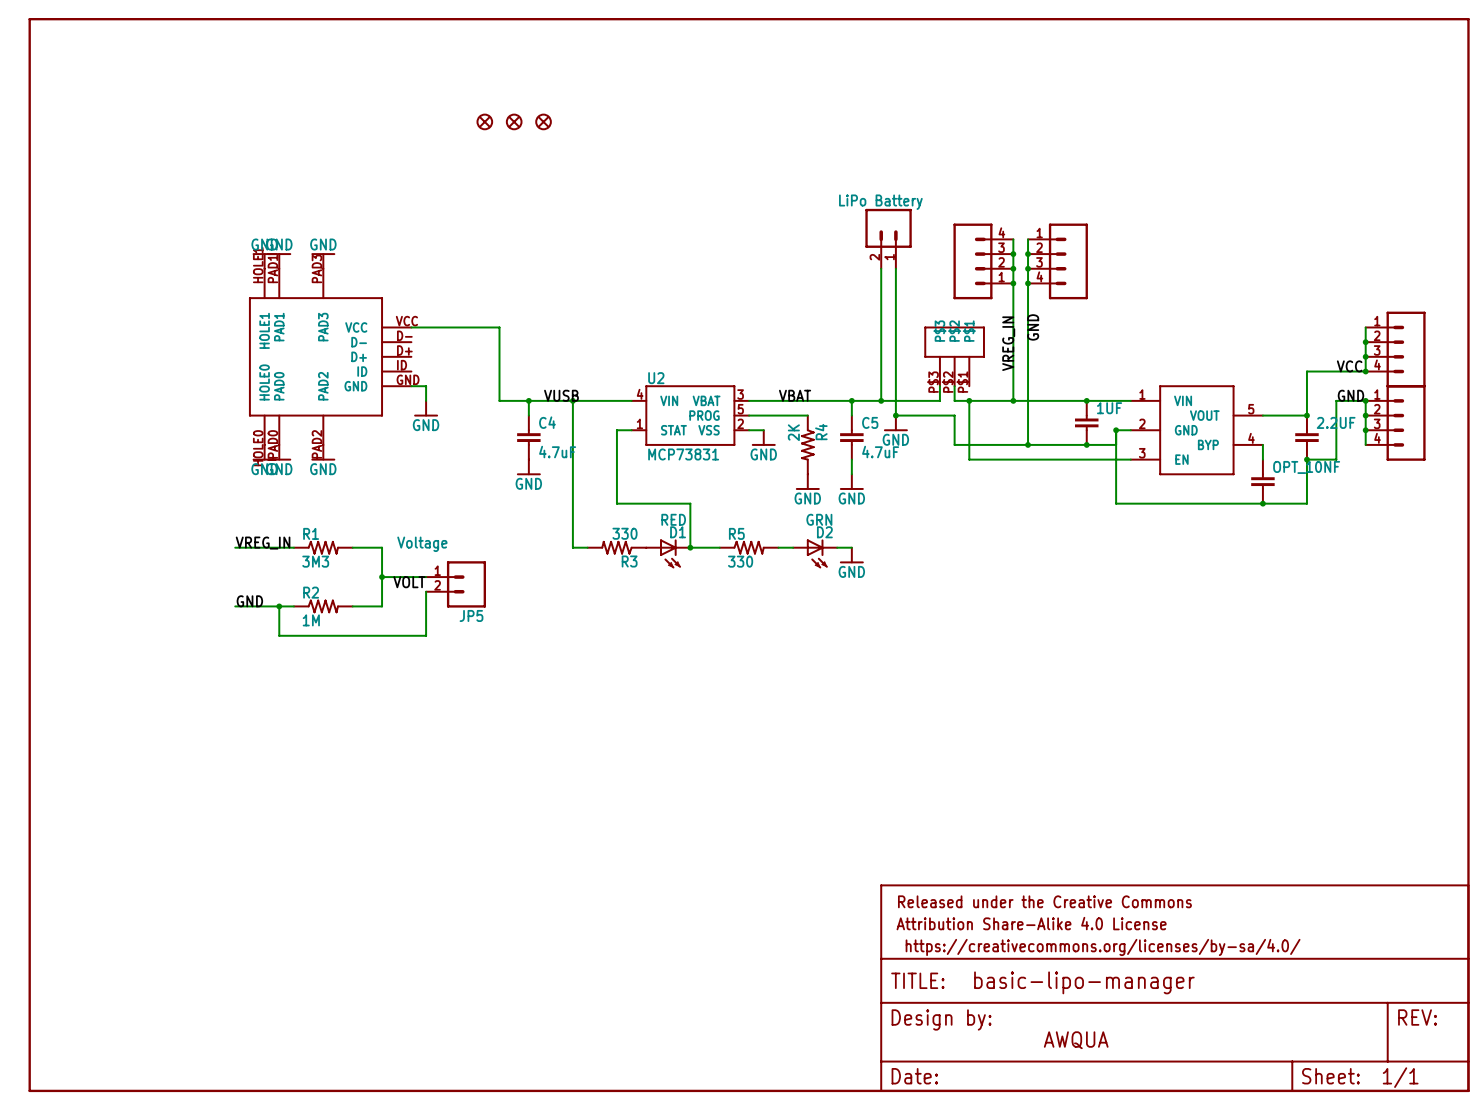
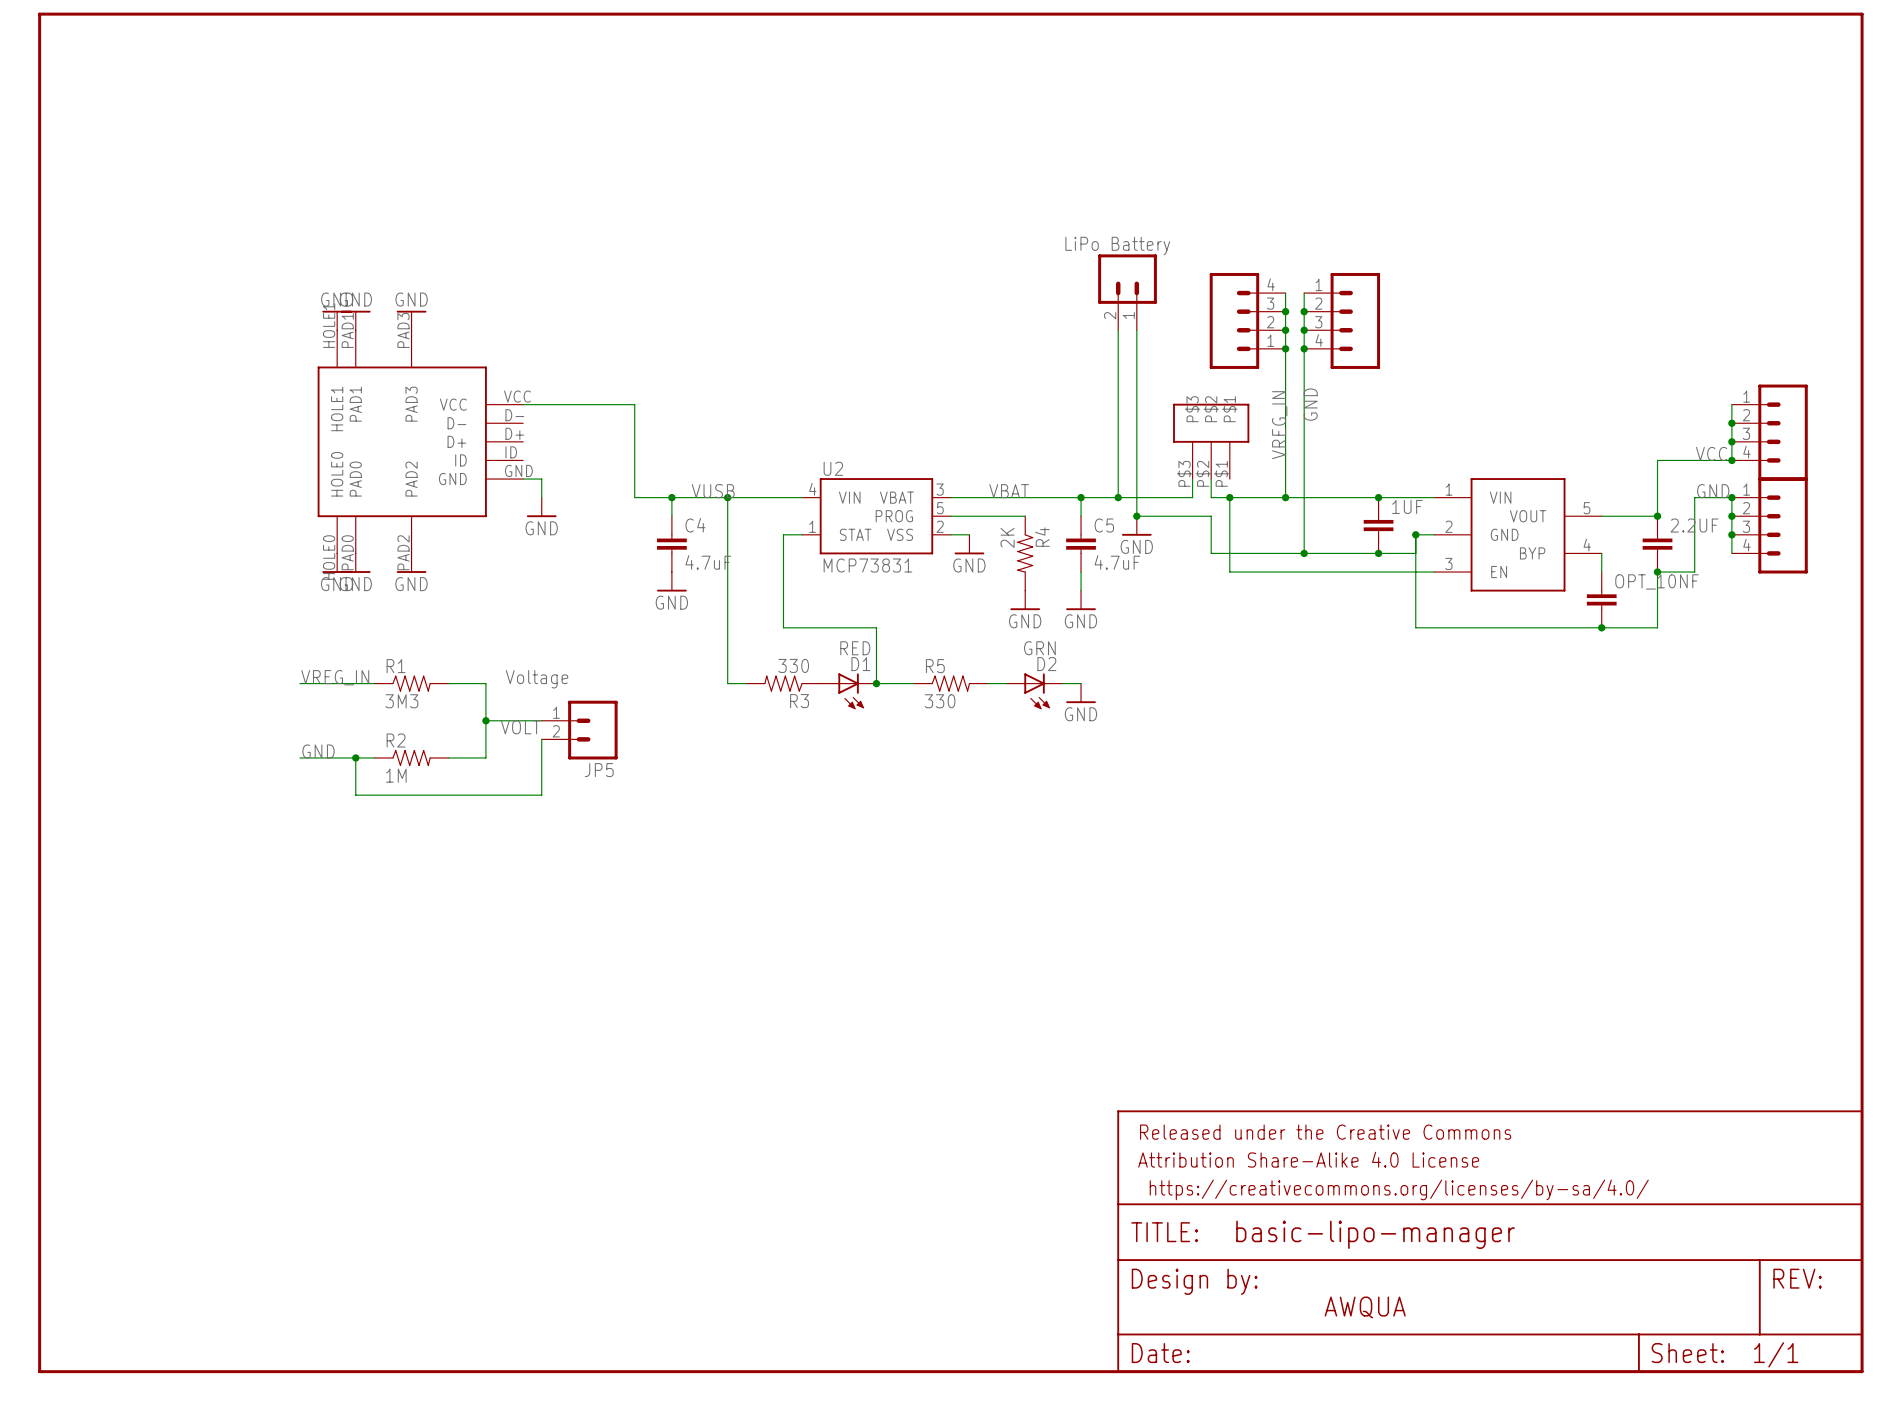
part: (484, 121) -> none
part: (514, 121) -> none
part: (543, 121) -> none

